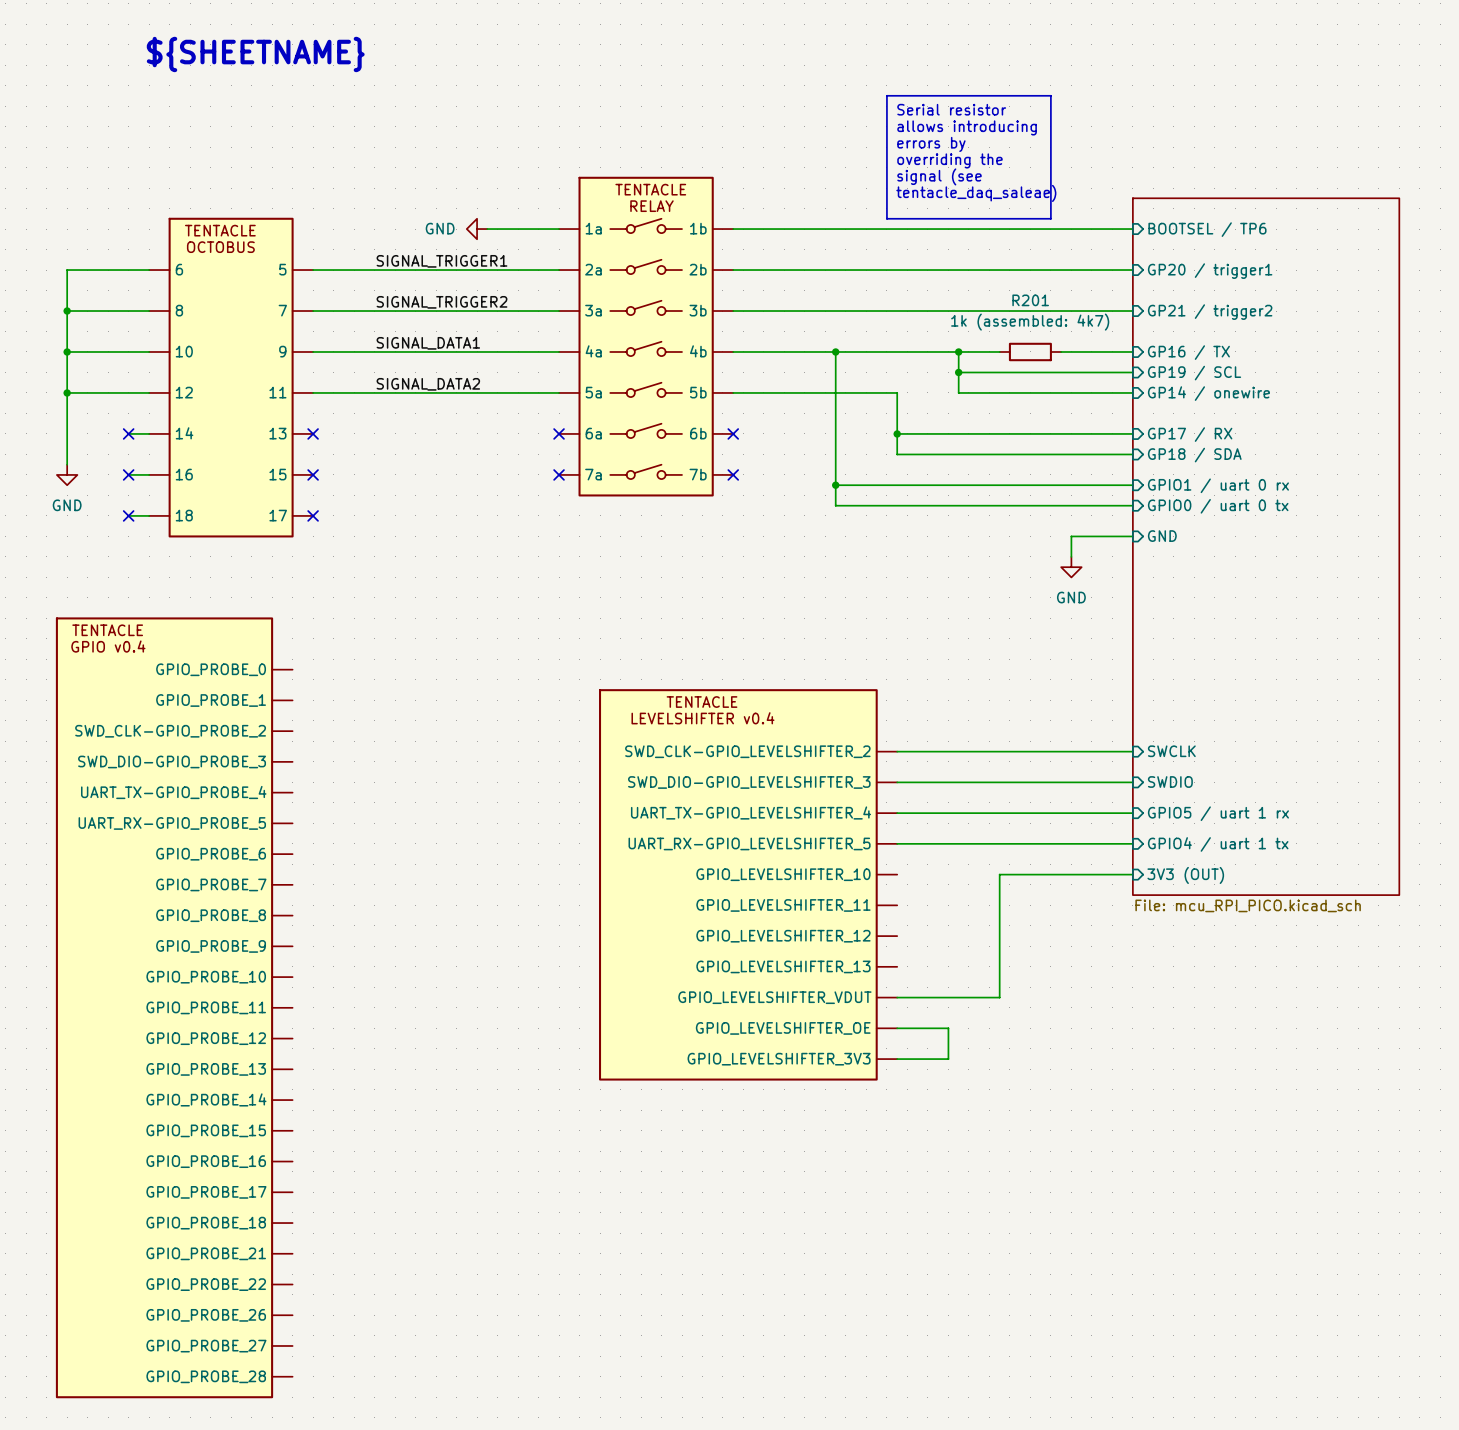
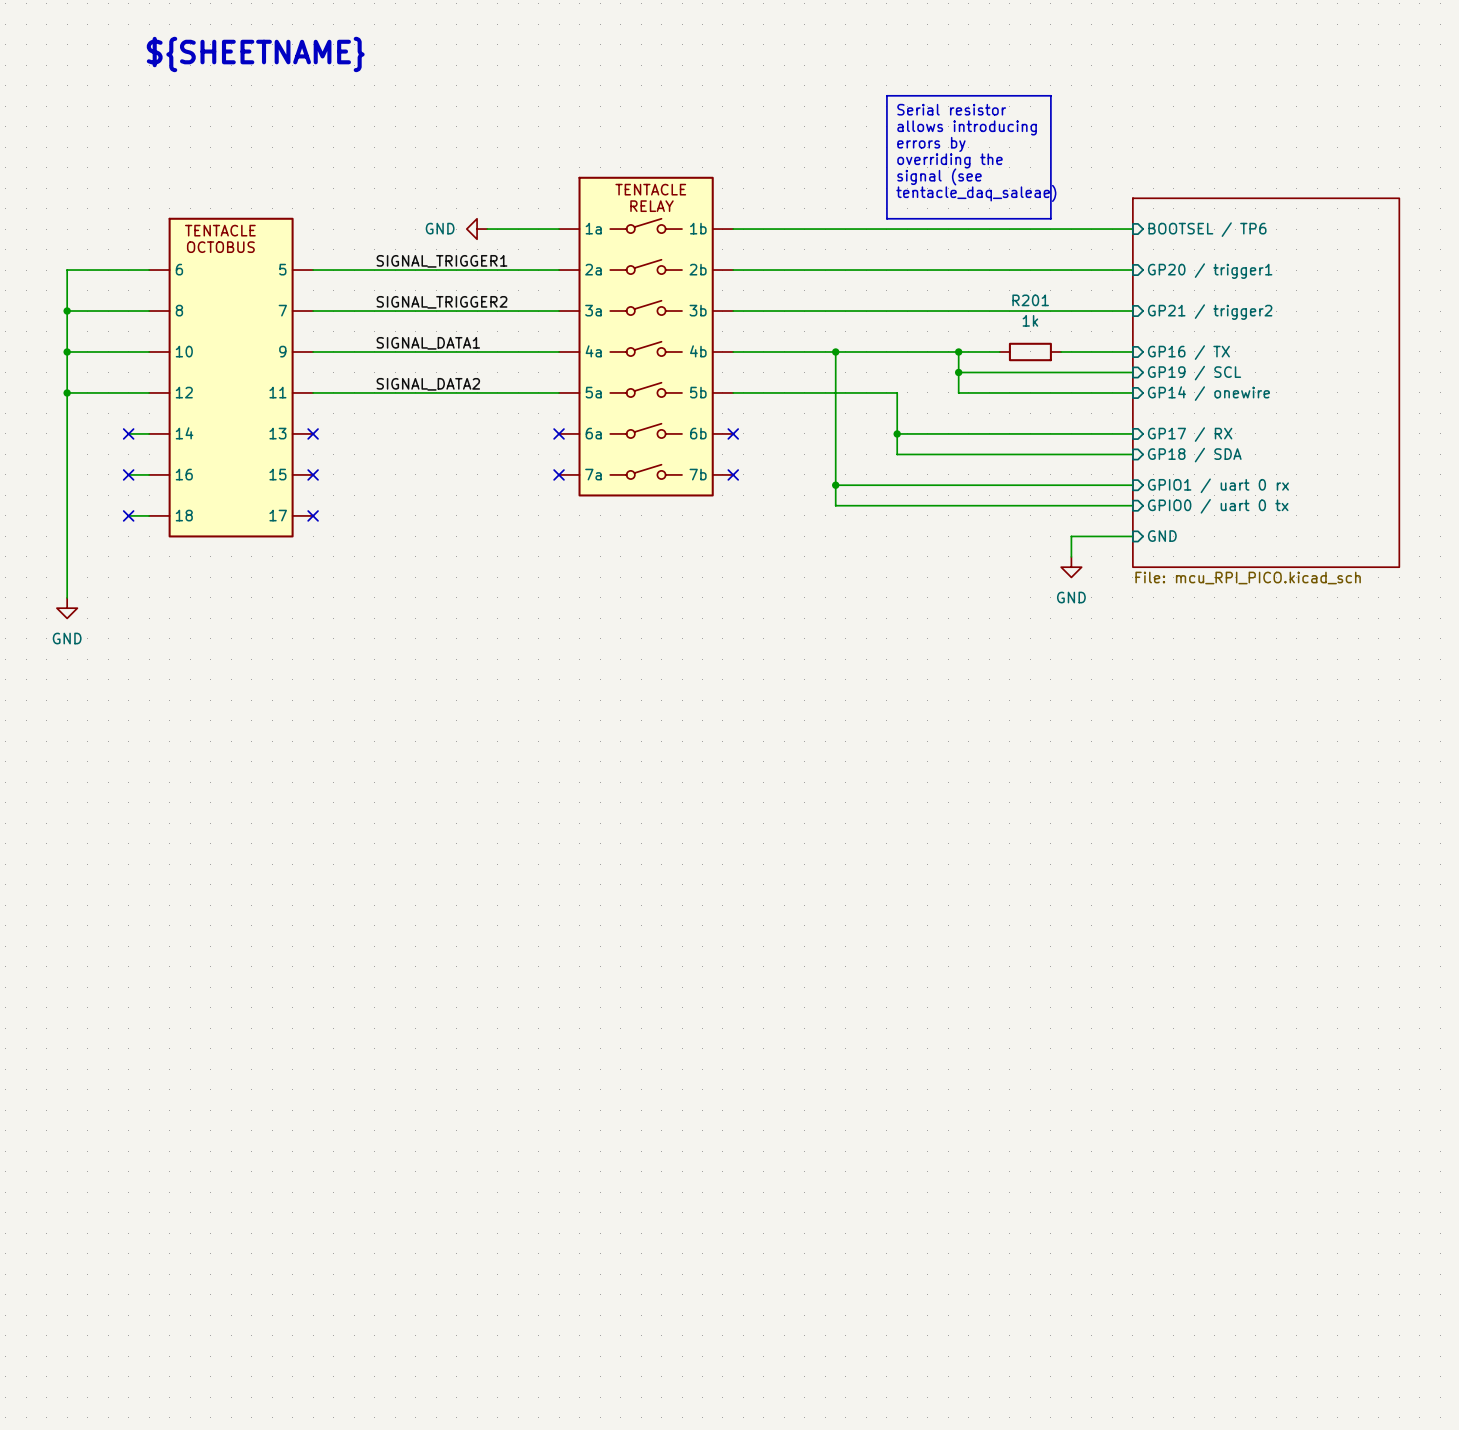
R201 value: 1k (assembled: 4k7) (1030, 322) -> 1k (1030, 320)
sheet: none -> File: mcu_RPI_PICO.kicad_sch (1266, 382)
wire: none -> (67, 464) (67, 597)
power symbol position: GND (67, 474) -> GND (67, 608)
sheet: File: mcu_RPI_PICO.kicad_sch (1266, 546) -> none
wire: (897, 751) (1132, 751) -> none
sheet pin: SWCLK (1171, 751) -> none
wire: (897, 782) (1132, 782) -> none
sheet pin: SWDIO (1170, 782) -> none
wire: (897, 813) (1132, 813) -> none
sheet pin: GPIO5 / uart 1 rx (1218, 813) -> none
wire: (897, 843) (1132, 843) -> none
sheet pin: GPIO4 / uart 1 tx (1218, 844) -> none
wire: (1132, 874) (999, 874) (999, 997) (897, 997) -> none
sheet pin: 3V3 (OUT) (1185, 875) -> none
part: (748, 884) -> none
part: (174, 1007) -> none
wire: (897, 1028) (948, 1028) (948, 1059) (897, 1059) -> none

